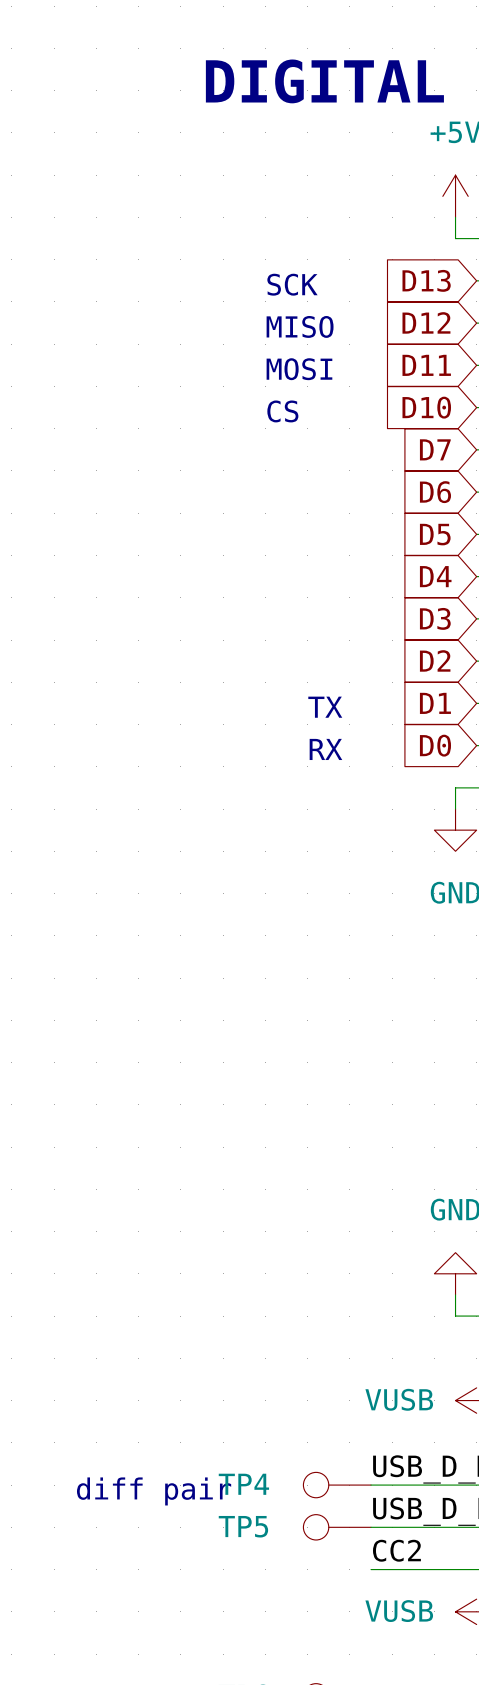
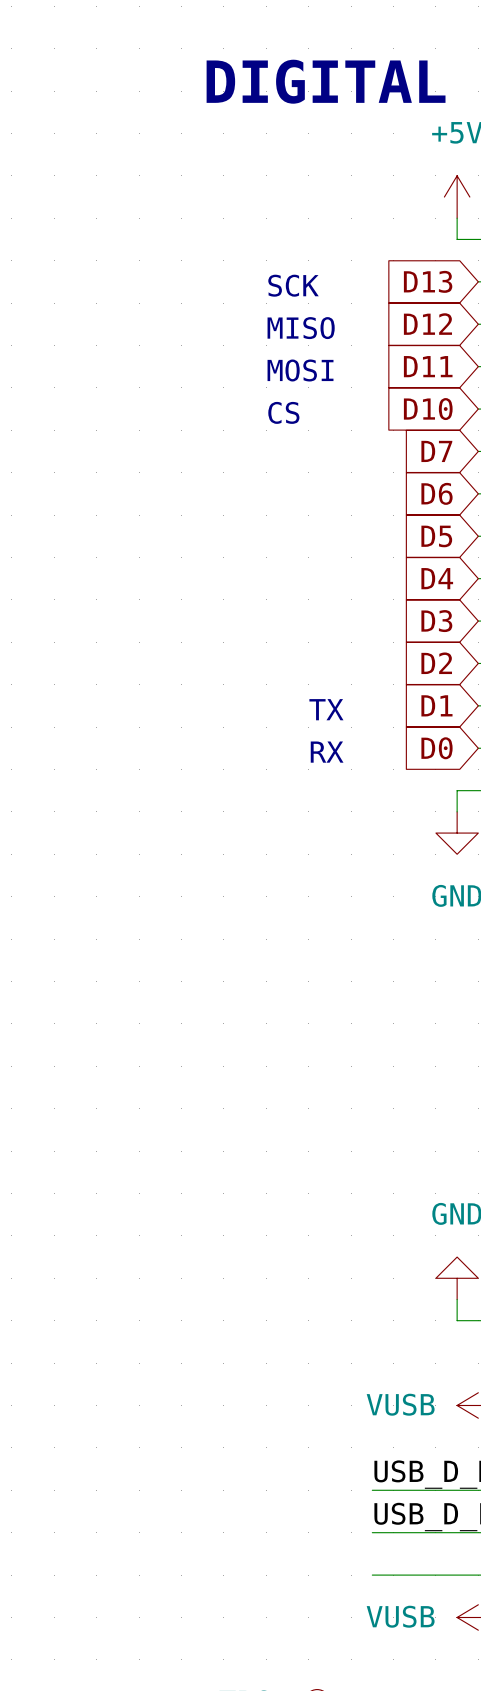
TP4: (337, 1485) -> none
text: diff pair (154, 1491) -> none
TP5: (337, 1527) -> none
label: CC2 (396, 1550) -> none

